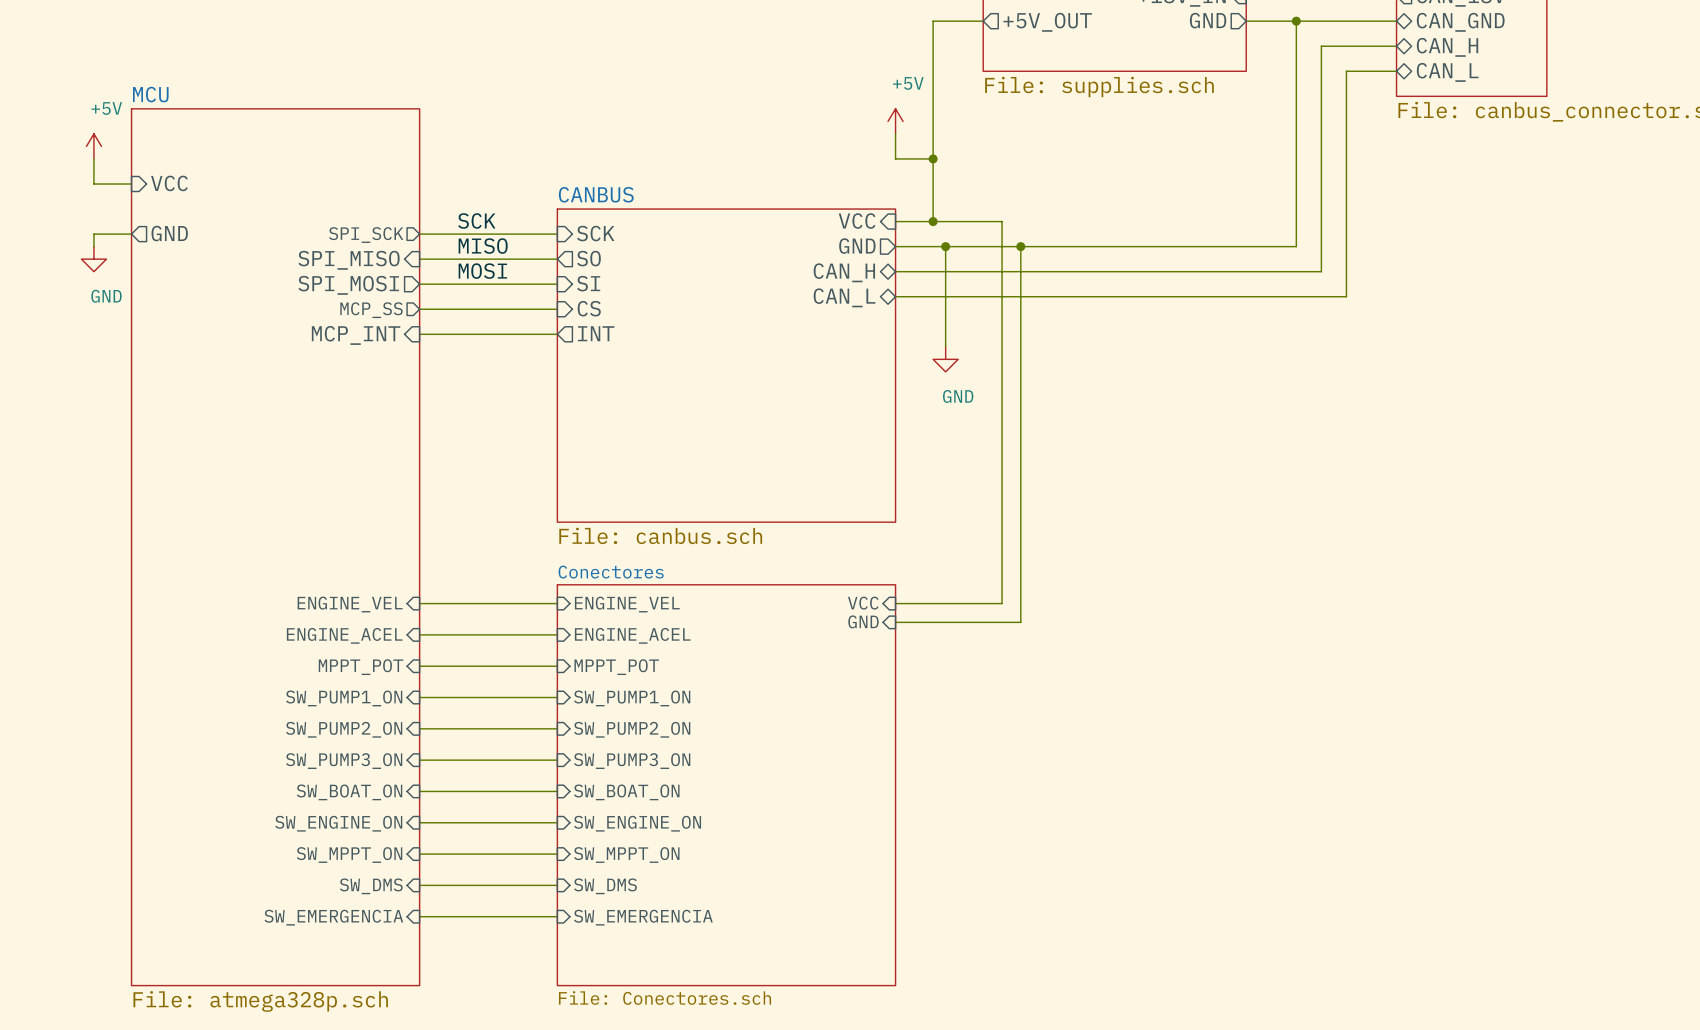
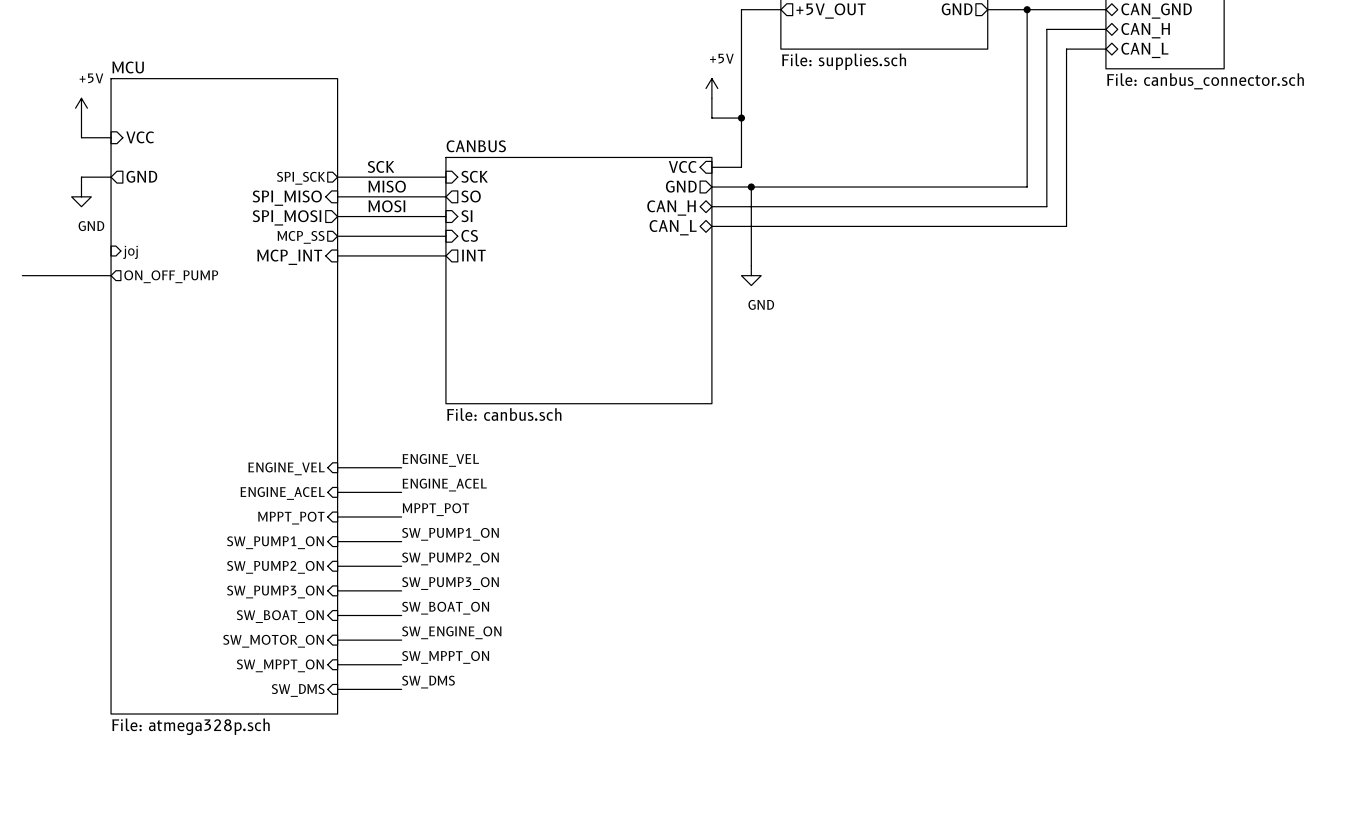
wire: (933, 221) (1002, 221) (1002, 603) (895, 603) -> none
junction: (933, 221) -> none
wire: (1020, 246) (1020, 622) (895, 622) -> none
junction: (1020, 246) -> none
sheet pin: none -> joj (130, 252)
wire: none -> (22, 275) (111, 275)
sheet pin: none -> ON_OFF_PUMP (171, 276)
sheet MCU: none -> File: atmega328p.sch (224, 396)
sheet MCU: File: atmega328p.sch (275, 547) -> none
label: none -> ENGINE_VEL (440, 460)
wire: (501, 603) (557, 603) -> none
sheet pin: VCC (863, 603) -> none
sheet pin: ENGINE_VEL (627, 604) -> none
sheet pin: GND (863, 621) -> none
label: none -> ENGINE_ACEL (444, 485)
wire: (501, 634) (557, 634) -> none
sheet pin: ENGINE_ACEL (632, 635) -> none
label: none -> MPPT_POT (435, 509)
wire: (501, 666) (557, 666) -> none
sheet pin: MPPT_POT (616, 667) -> none
label: none -> SW_PUMP1_ON (450, 534)
wire: (501, 697) (557, 697) -> none
sheet pin: SW_PUMP1_ON (632, 698) -> none
label: none -> SW_PUMP2_ON (450, 558)
wire: (501, 728) (557, 728) -> none
sheet pin: SW_PUMP2_ON (632, 729) -> none
label: none -> SW_PUMP3_ON (450, 583)
wire: (501, 760) (557, 760) -> none
sheet pin: SW_PUMP3_ON (632, 761) -> none
label: none -> SW_BOAT_ON (445, 608)
sheet Conectores: File: Conectores.sch (726, 785) -> none
wire: (501, 791) (557, 791) -> none
sheet pin: SW_BOAT_ON (626, 792) -> none
label: none -> SW_ENGINE_ON (451, 632)
wire: (501, 822) (557, 822) -> none
sheet pin: SW_ENGINE_ON (338, 823) -> SW_MOTOR_ON (273, 641)
sheet pin: SW_ENGINE_ON (637, 823) -> none
label: none -> SW_MPPT_ON (445, 657)
wire: (501, 854) (557, 854) -> none
sheet pin: SW_MPPT_ON (626, 855) -> none
label: none -> SW_DMS (428, 682)
wire: (501, 885) (557, 885) -> none
sheet pin: SW_DMS (605, 886) -> none
wire: (419, 916) (557, 916) -> none
sheet pin: SW_EMERGENCIA (333, 917) -> none
sheet pin: SW_EMERGENCIA (643, 917) -> none

